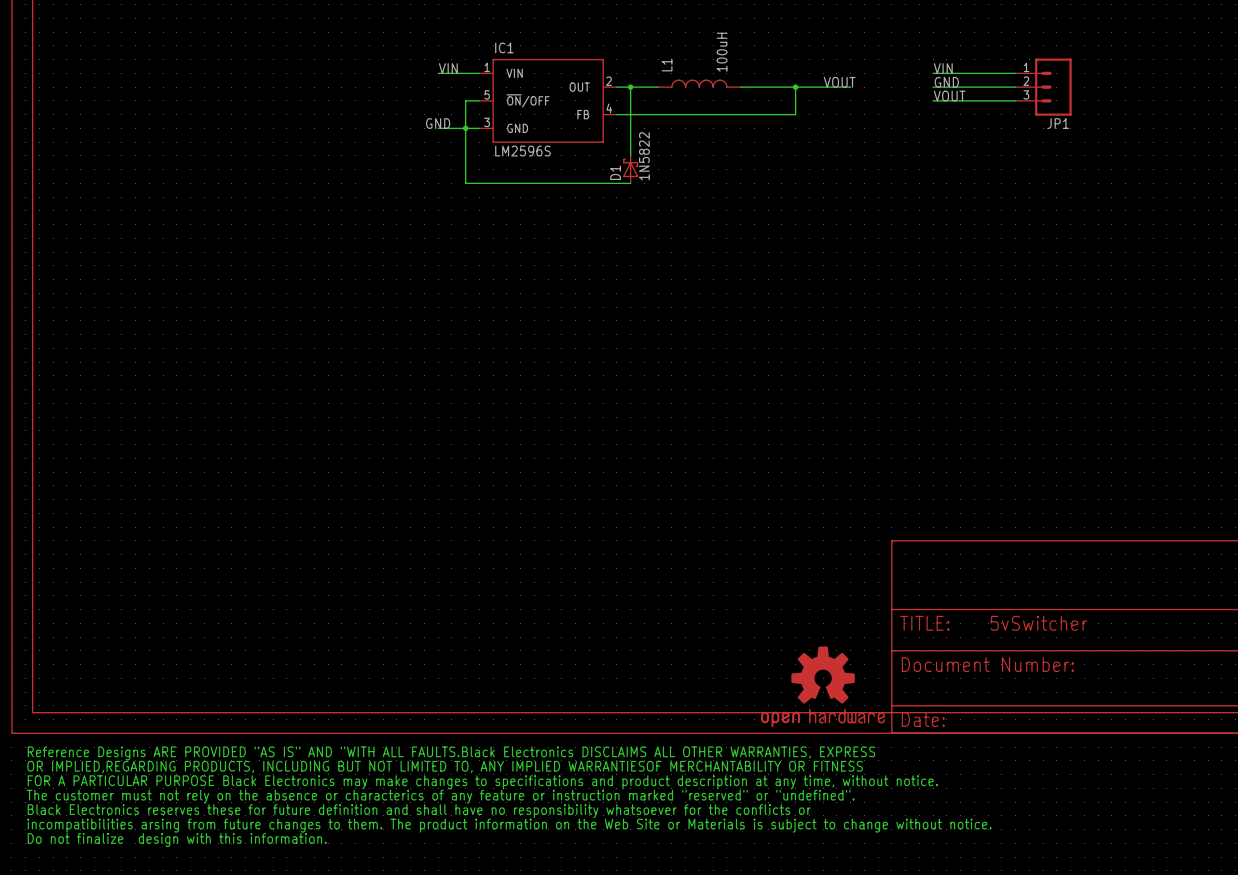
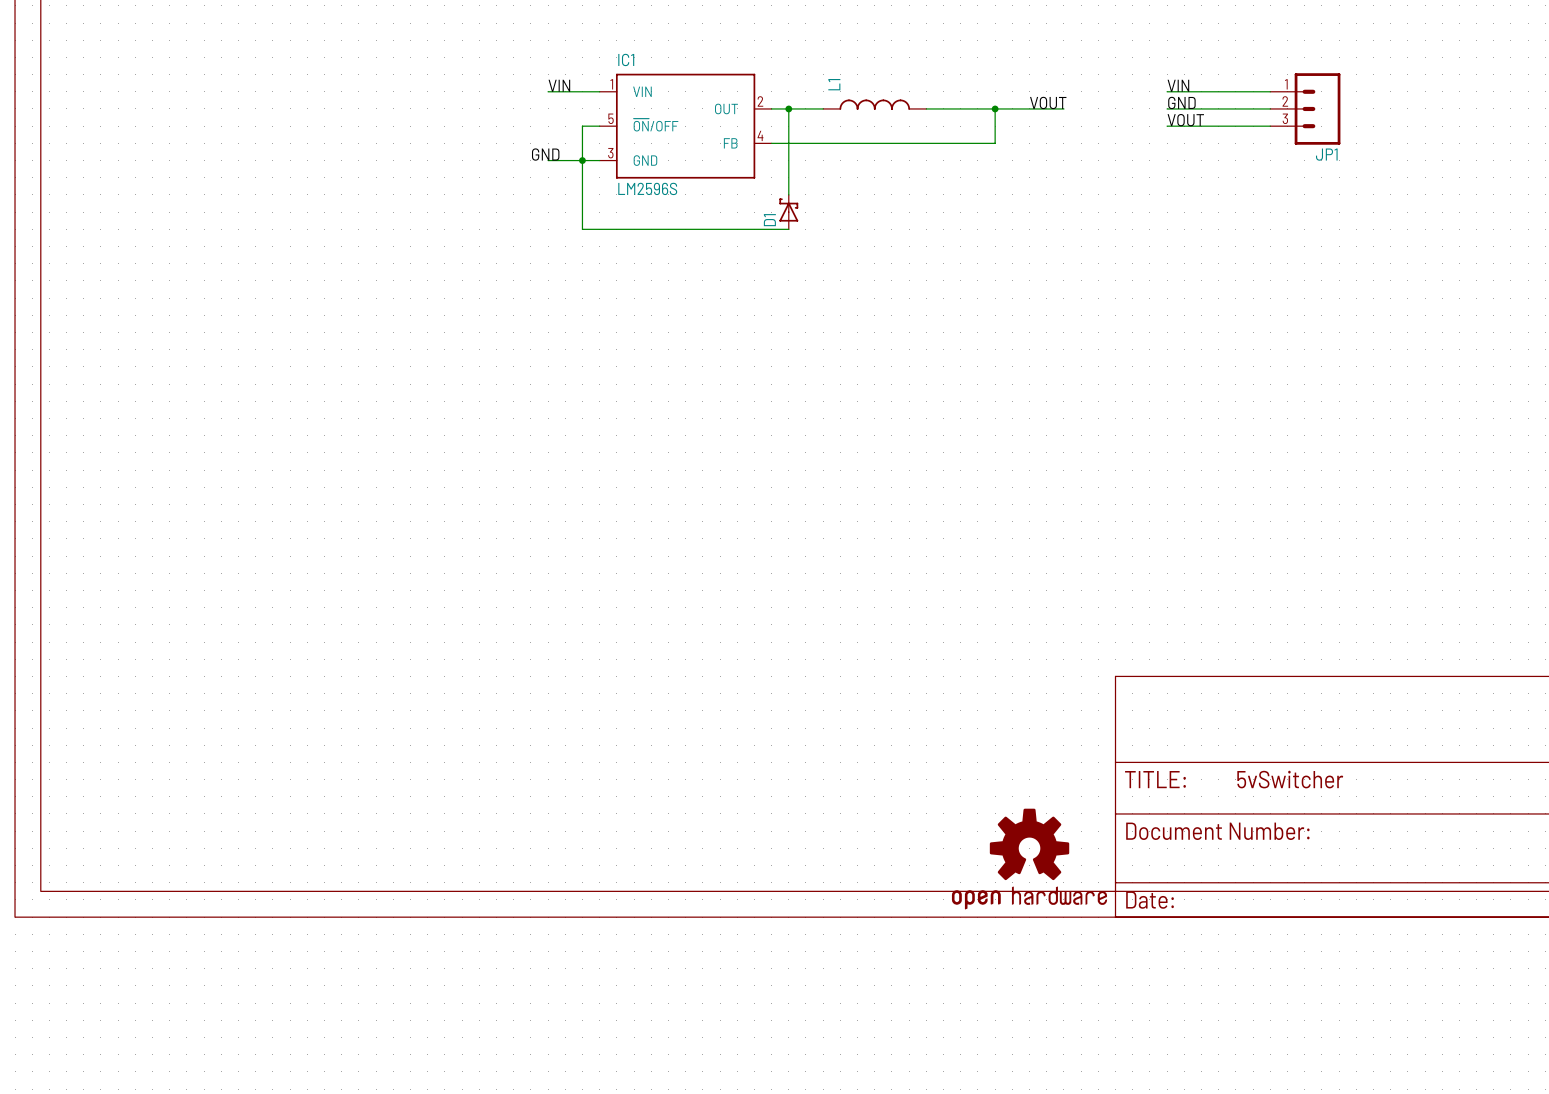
L1 value: 100uH (722, 52) -> none
D1 value: 1N5822 (644, 156) -> none
text: Reference Designs ARE PROVIDED "AS IS" AND "WITH ALL FAULTS.Black Electronics DISCLAIMS ALL OTHER WARRANTIES, EXPRESS (451, 753) -> none
text: OR IMPLIED,REGARDING PRODUCTS, INCLUDING BUT NOT LIMITED TO, ANY IMPLIED WARRANTIESOF MERCHANTABILITY OR FITNESS (445, 766) -> none
text: FOR A PARTICULAR PURPOSE Black Electronics may make changes to specifications and product description at any time, without notice. (482, 782) -> none
text: The customer must not rely on the absence or characterics of any feature or instruction marked "reserved" or "undefined". (440, 796) -> none
text: Black Electronics reserves these for future definition and shall have no responsibility whatsoever for the conflicts or (419, 811) -> none
text: incompatibilities arsing from future changes to them. The product information on the Web Site or Materials is subject to change without notice. (509, 825) -> none
text: Do not finalize design with this information. (177, 840) -> none

